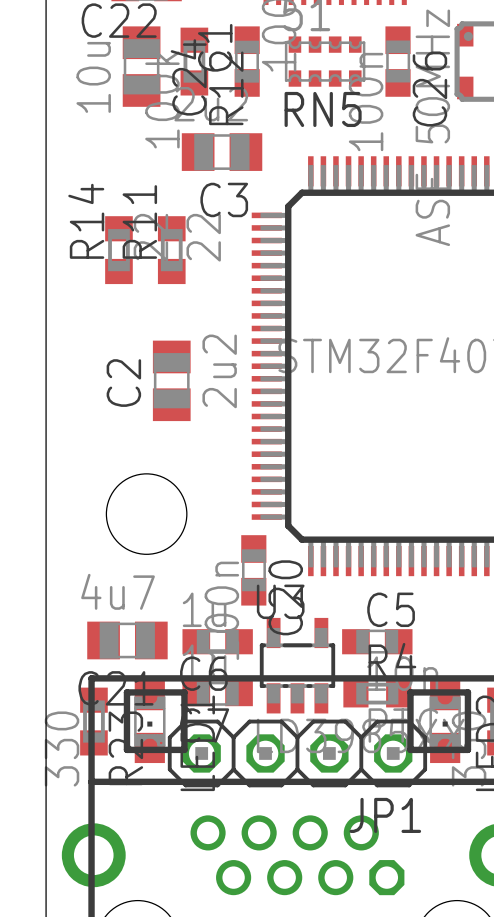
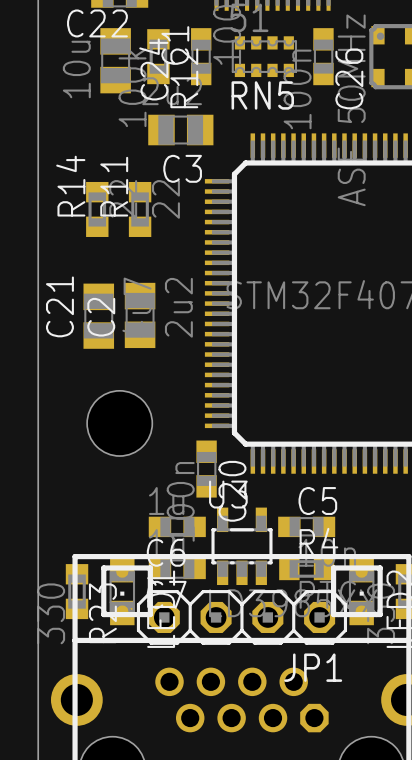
C21 rotation: 0° (127, 640) -> 90° clockwise (98, 316)
C21 position: (127, 640) -> (98, 316)

